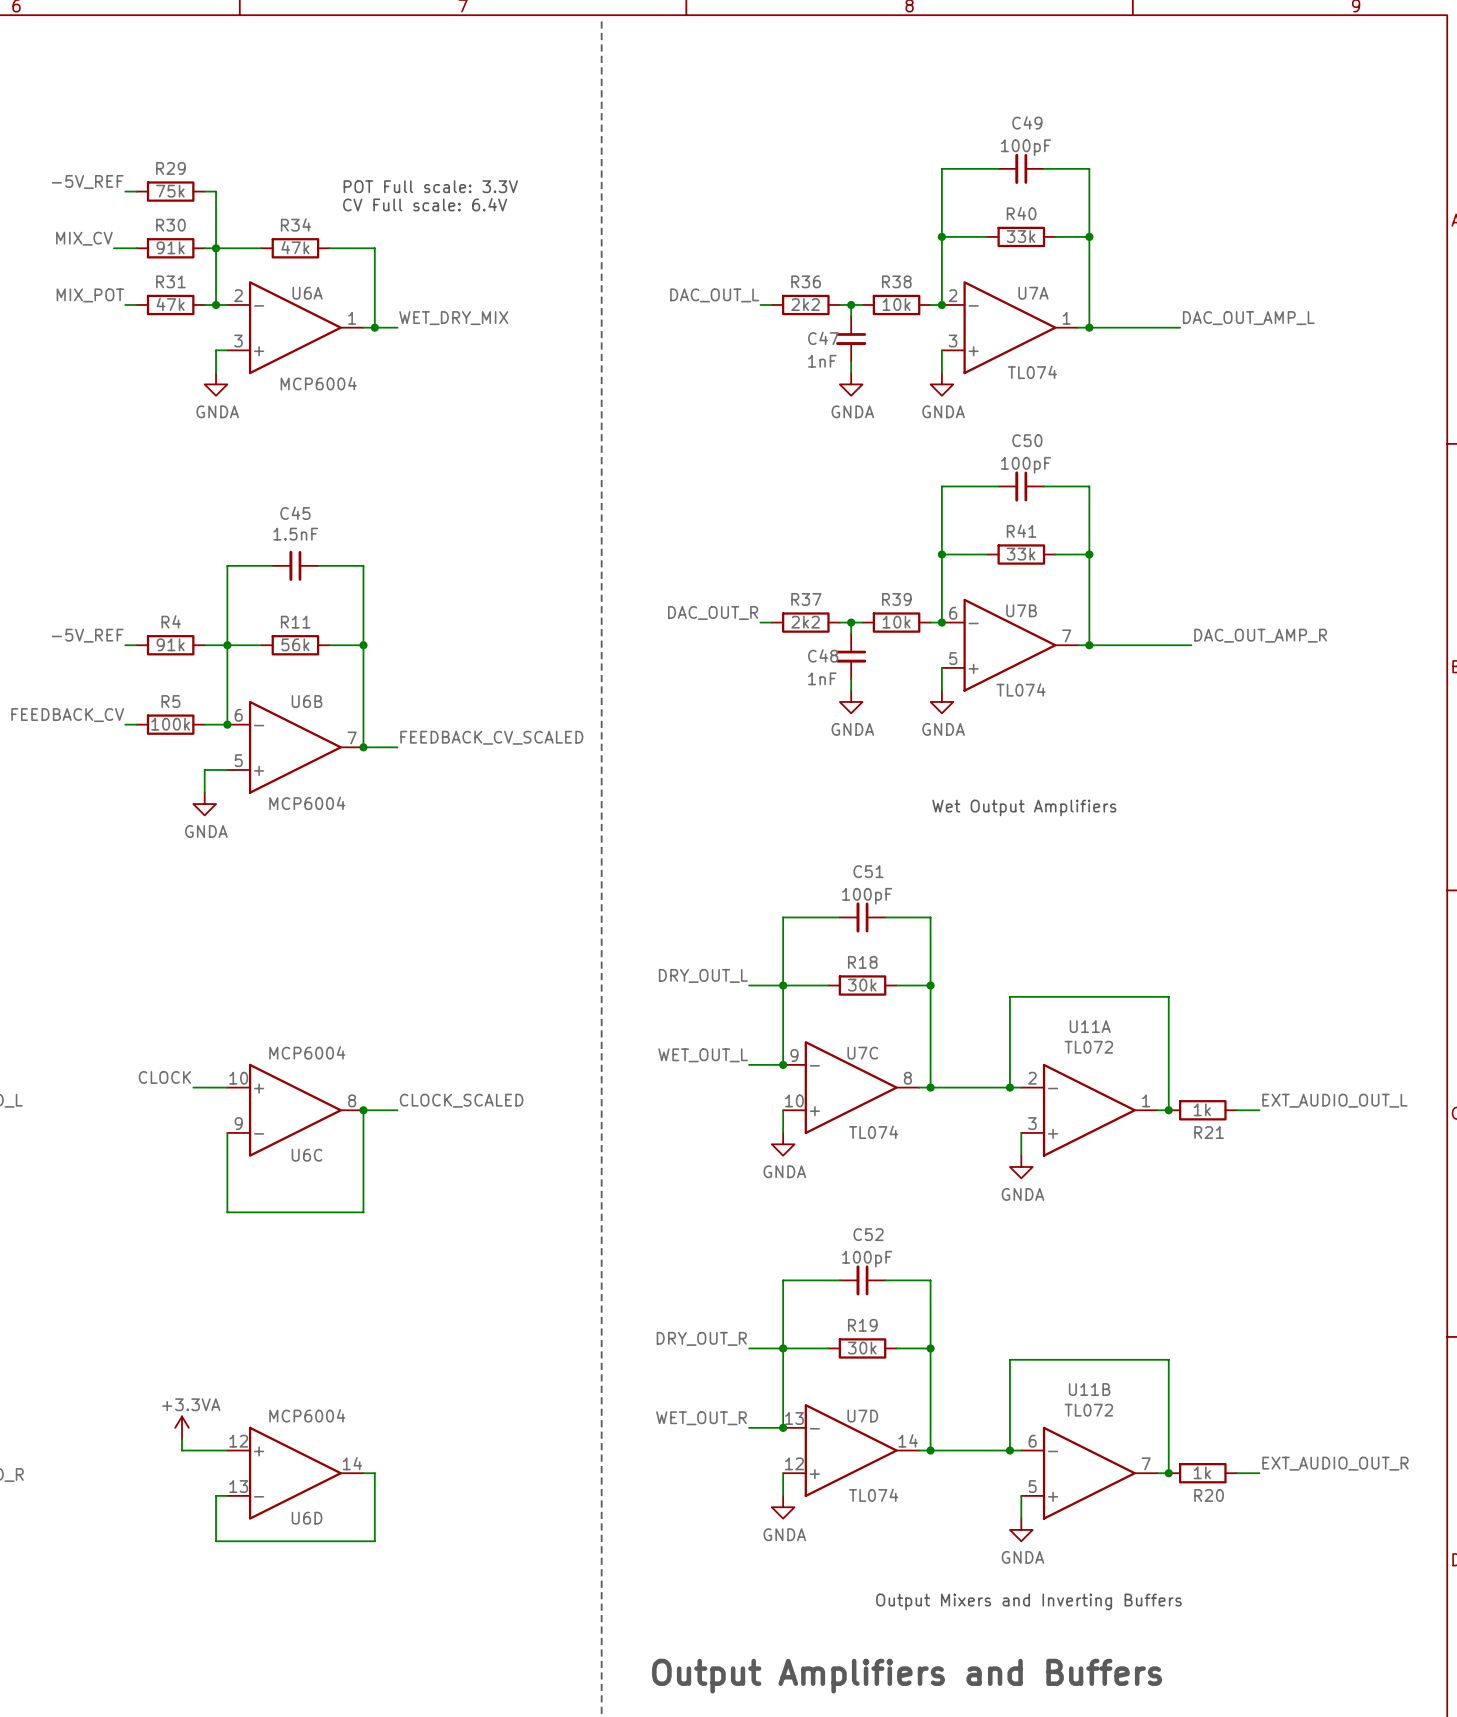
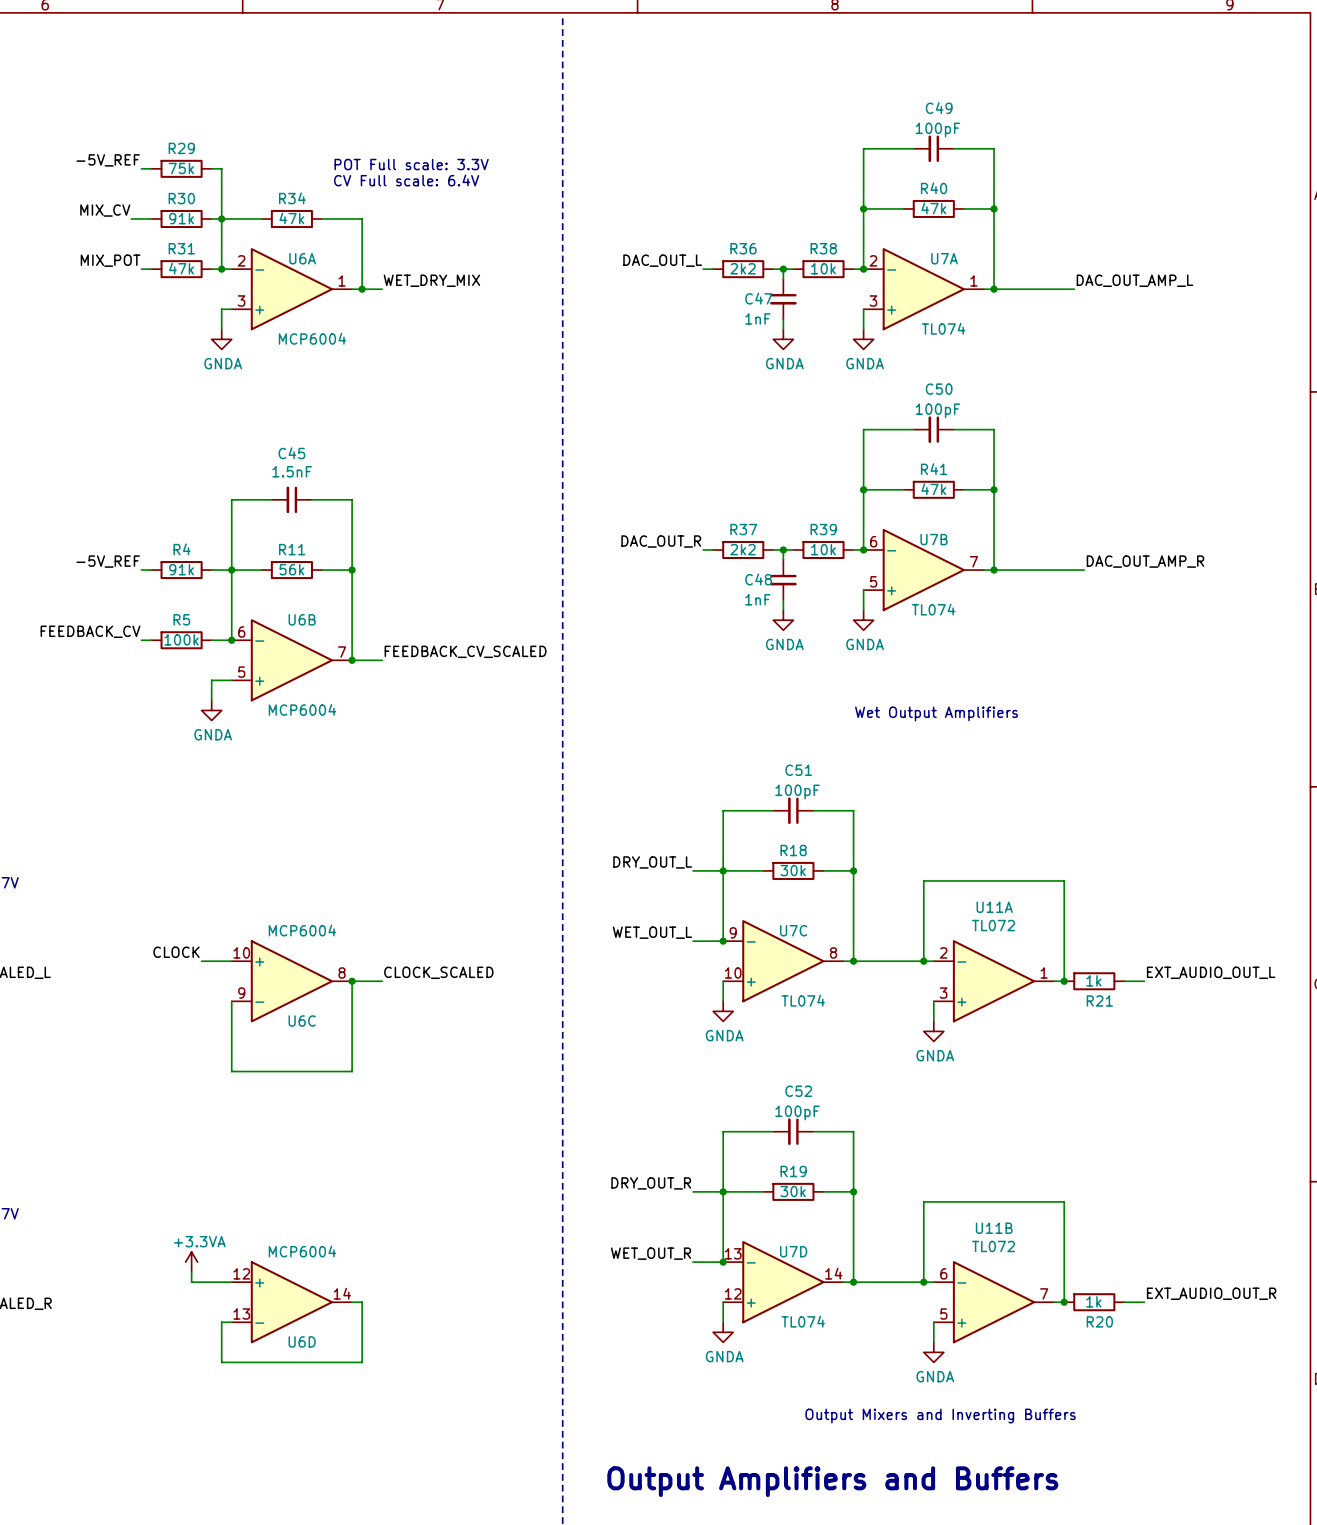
R40 value: 33k (1021, 236) -> 47k (933, 208)
R41 value: 33k (1021, 554) -> 47k (933, 489)

